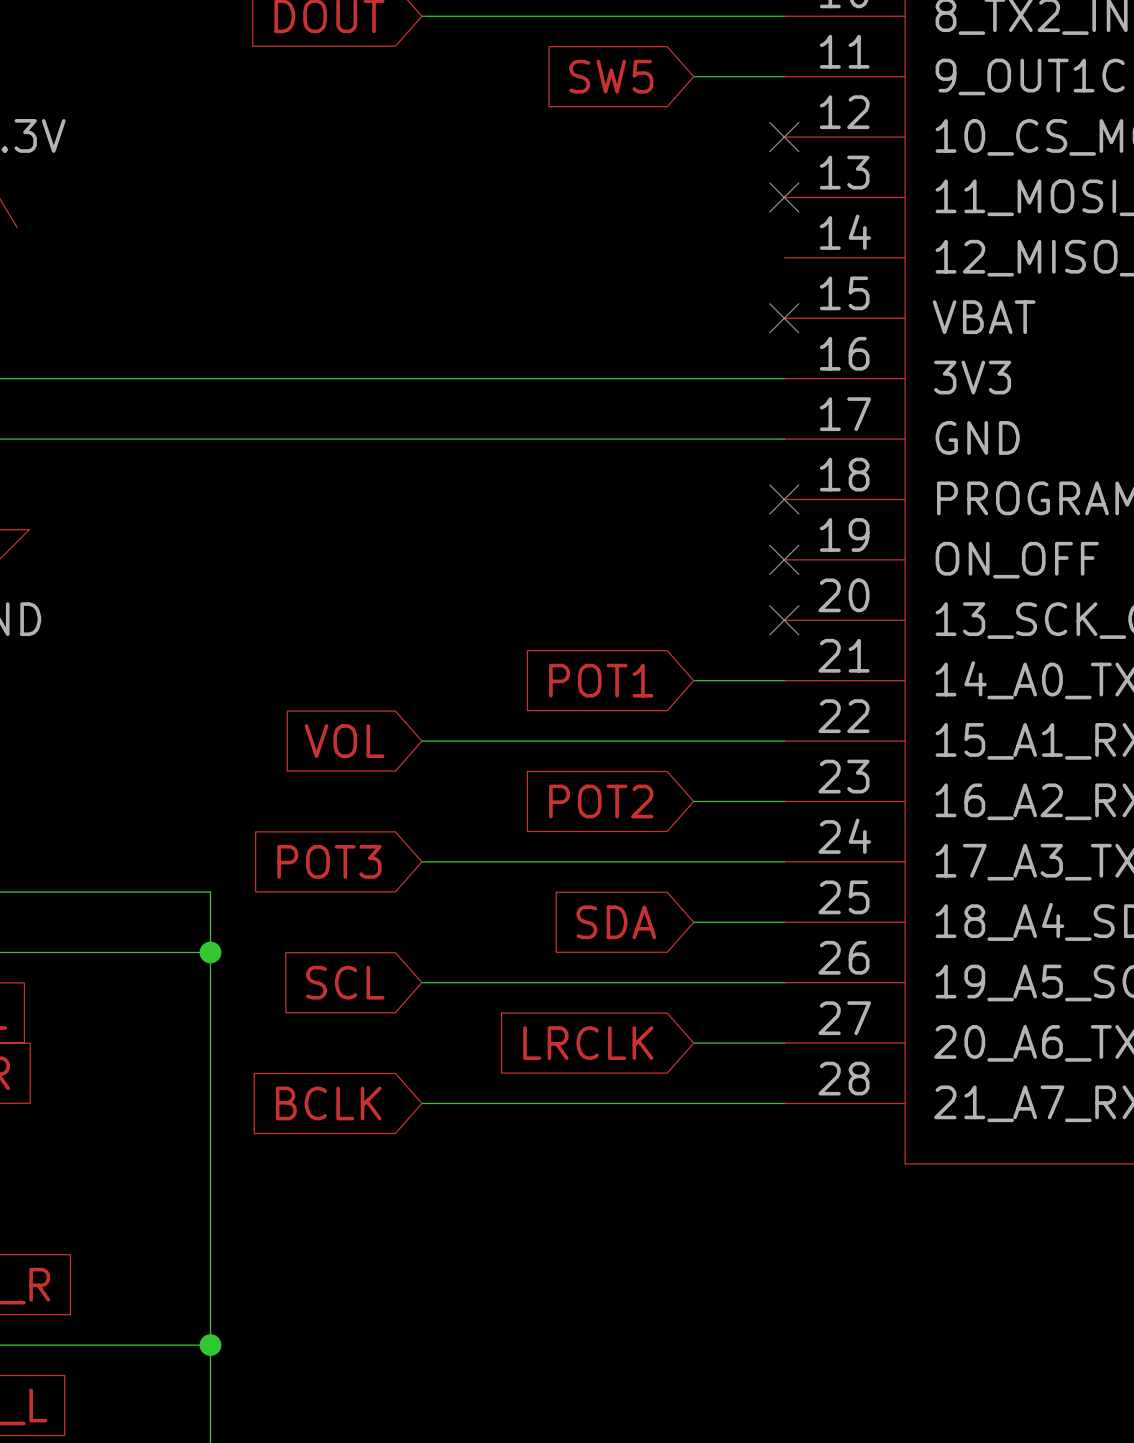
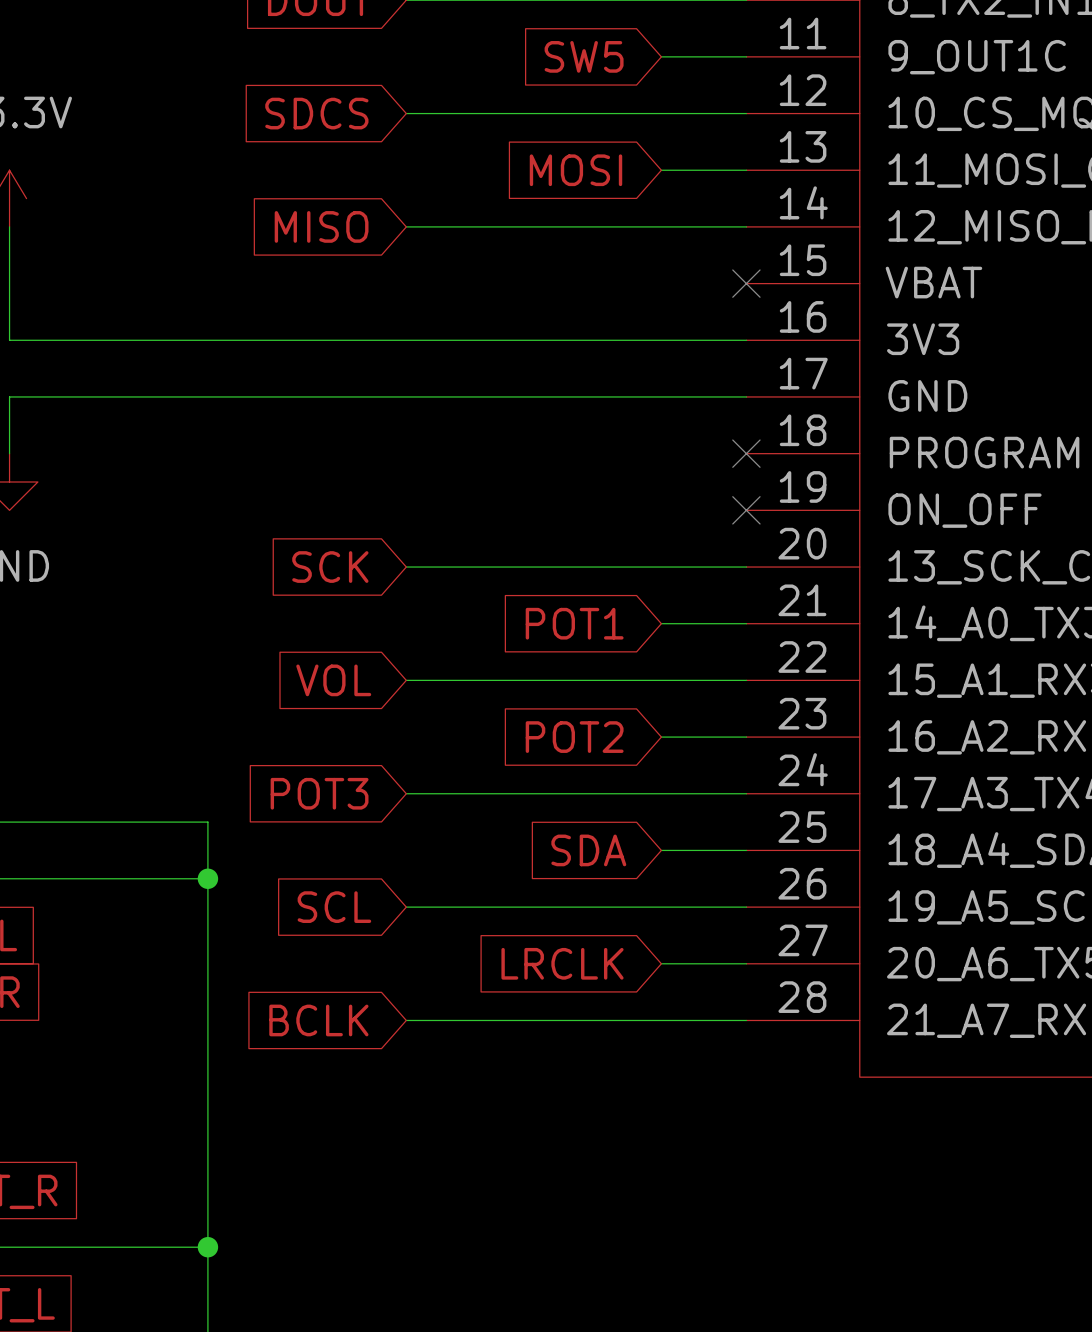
global label: none -> SDCS (316, 113)
wire: none -> (406, 113) (746, 113)
no-connect mark: (784, 137) -> none
global label: none -> MOSI (575, 170)
wire: none -> (661, 170) (746, 170)
no-connect mark: (784, 197) -> none
global label: none -> MISO (321, 226)
wire: none -> (406, 226) (746, 226)
global label: none -> SCK (330, 567)
wire: none -> (406, 567) (746, 567)
no-connect mark: (784, 620) -> none

